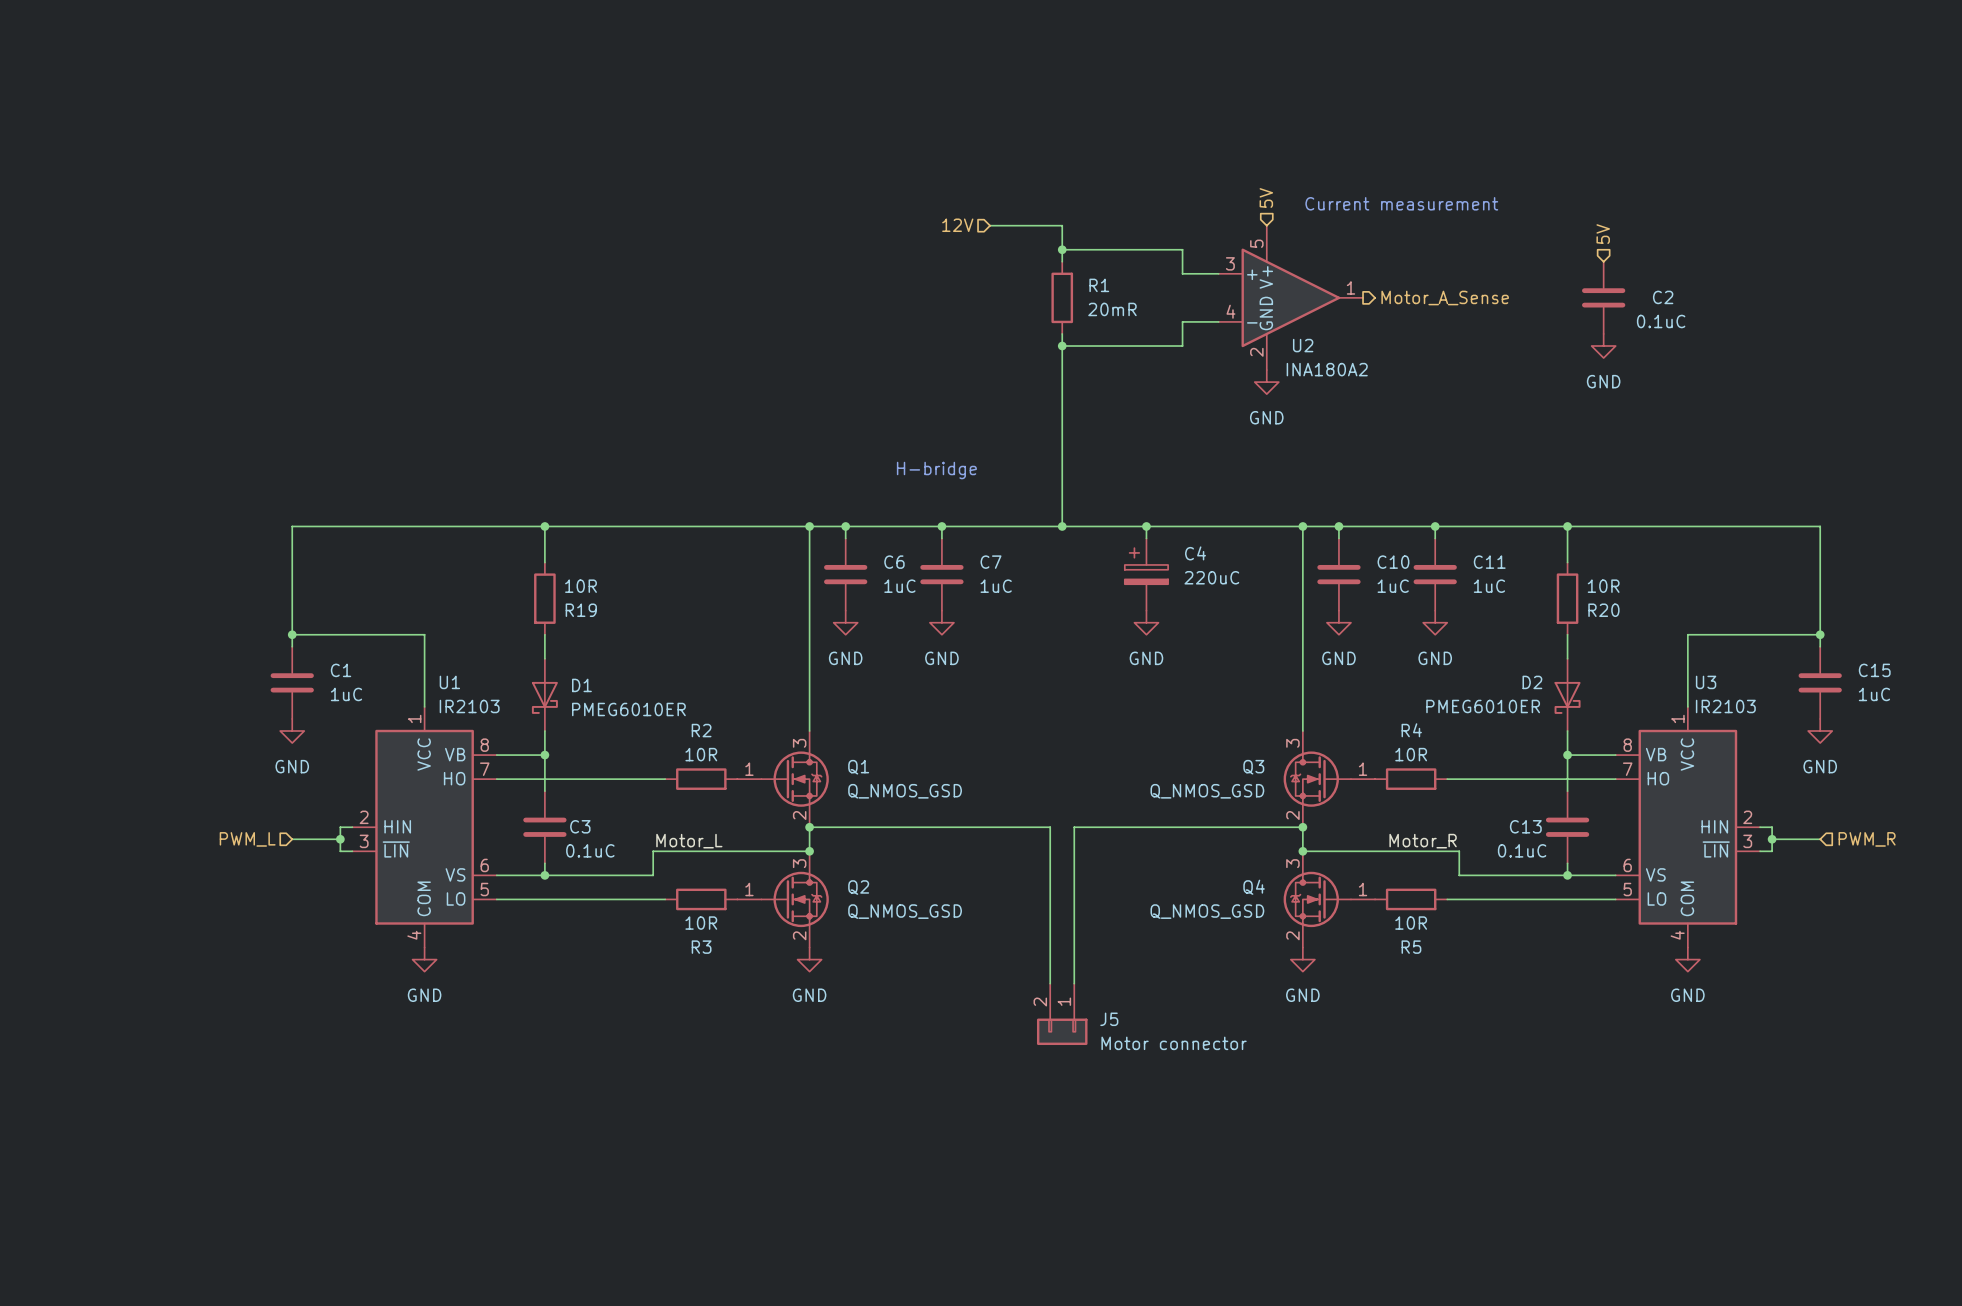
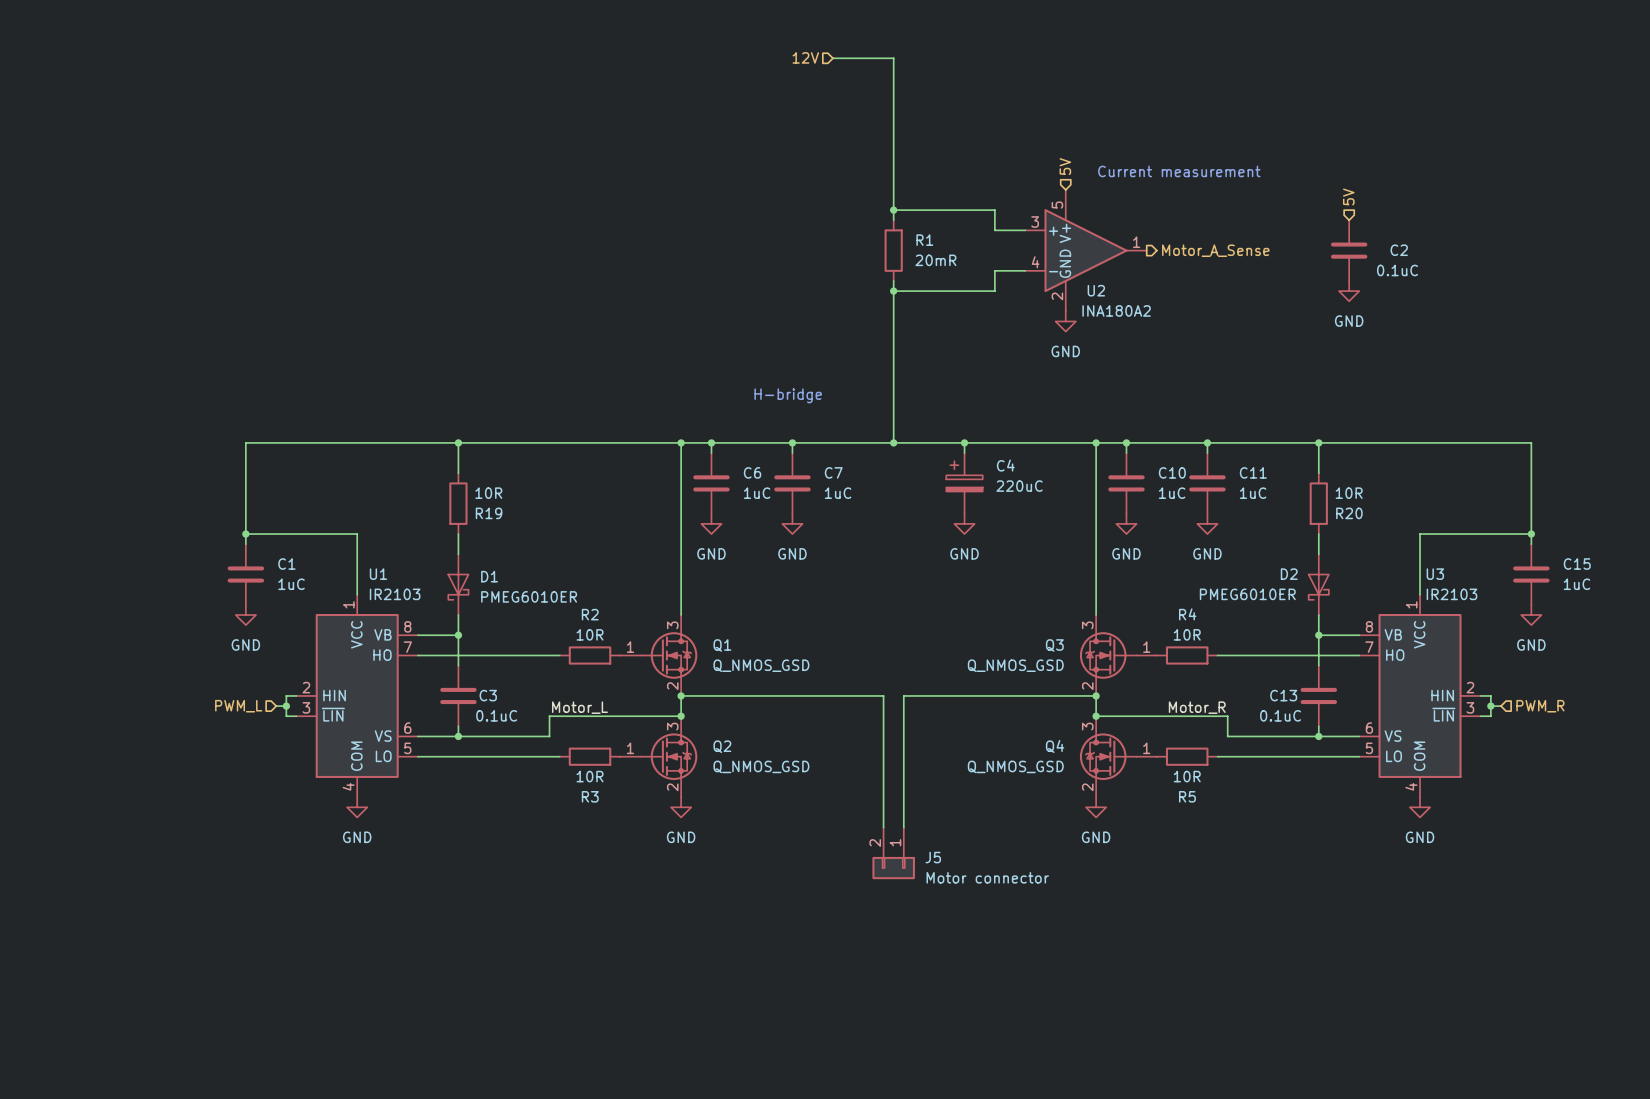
hierarchical label position: 12V (957, 225) -> 12V (805, 57)
wire: (990, 225) (1062, 225) -> (832, 58) (893, 58) (893, 189)
hierarchical label position: PWM_L (247, 839) -> PWM_L (238, 706)
wire: (292, 839) (328, 839) -> none
wire: (1784, 839) (1820, 839) -> none
hierarchical label position: PWM_R (1867, 839) -> PWM_R (1540, 706)

